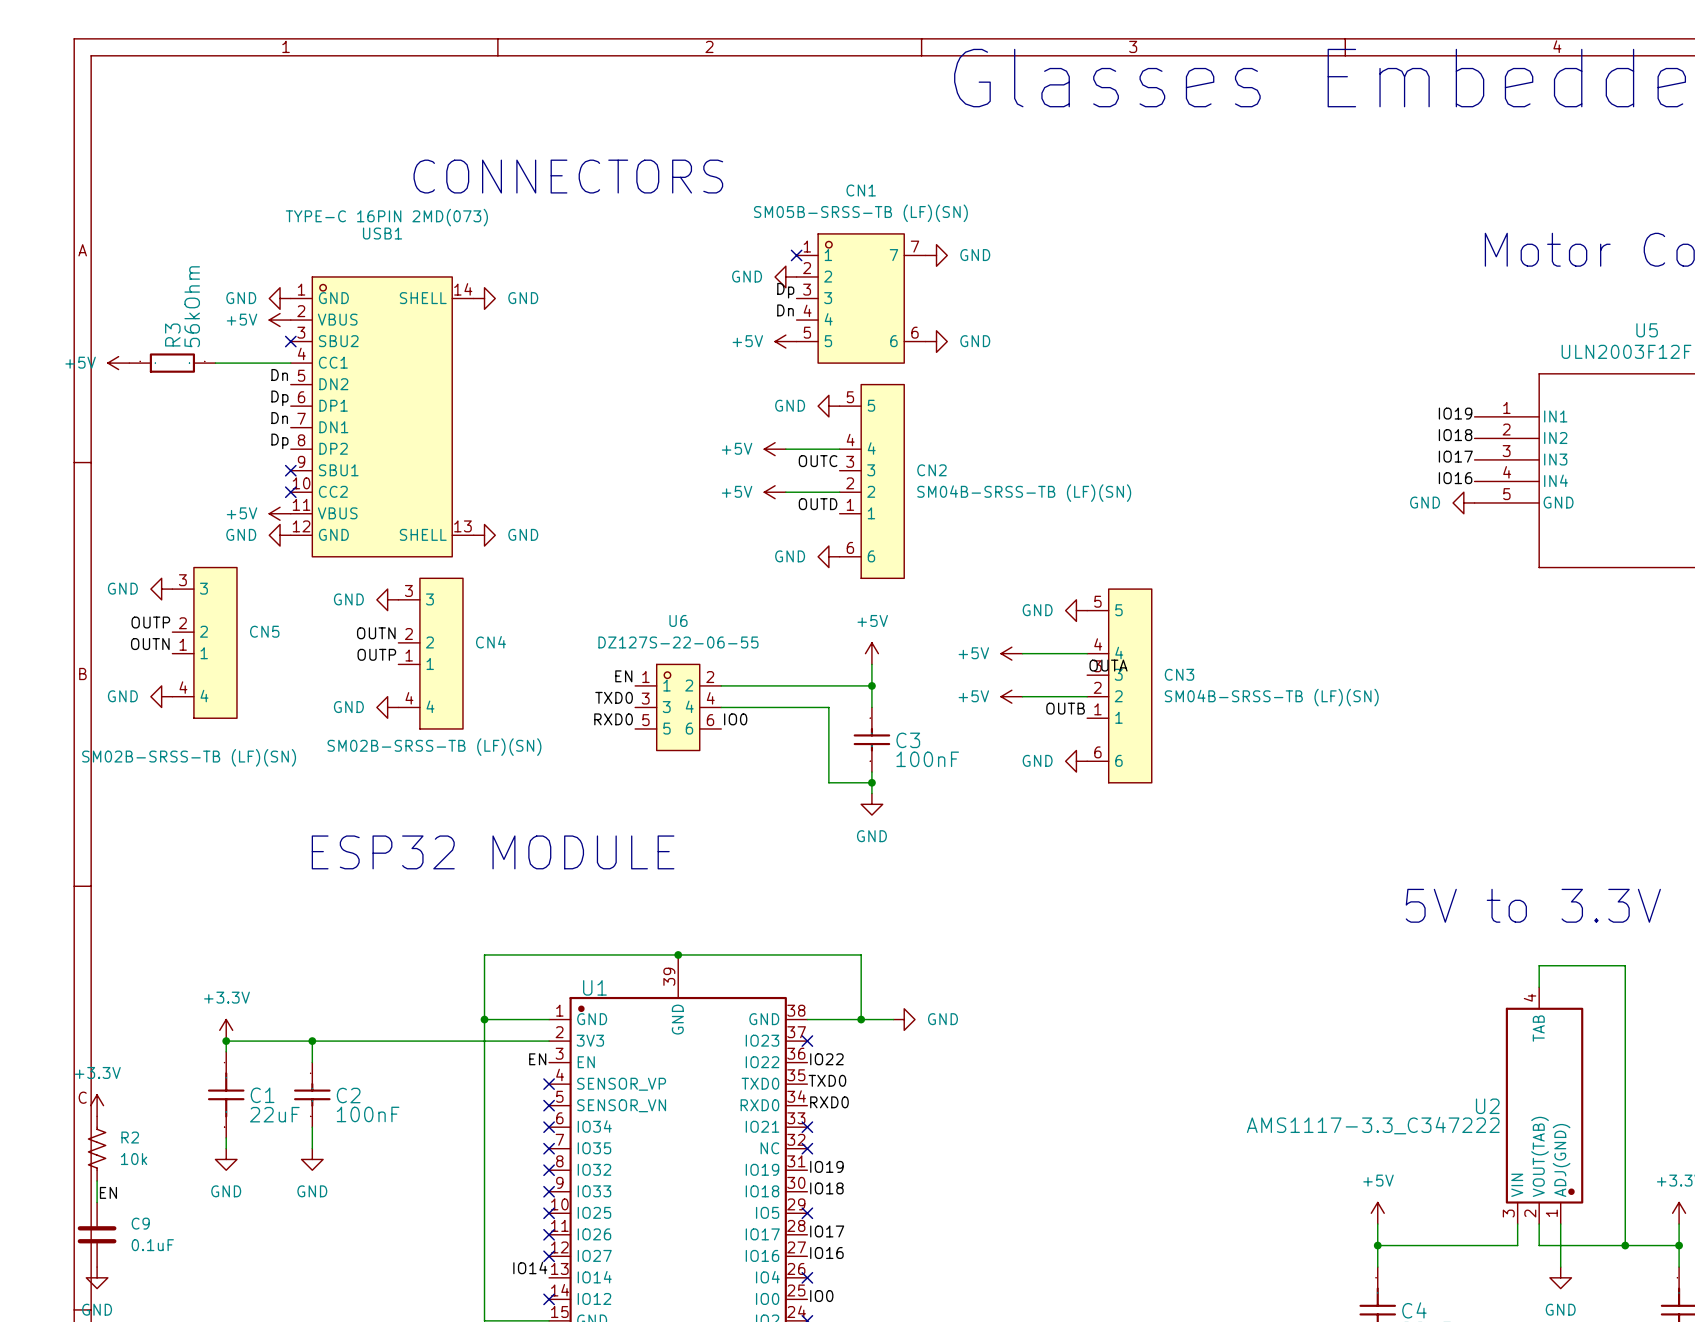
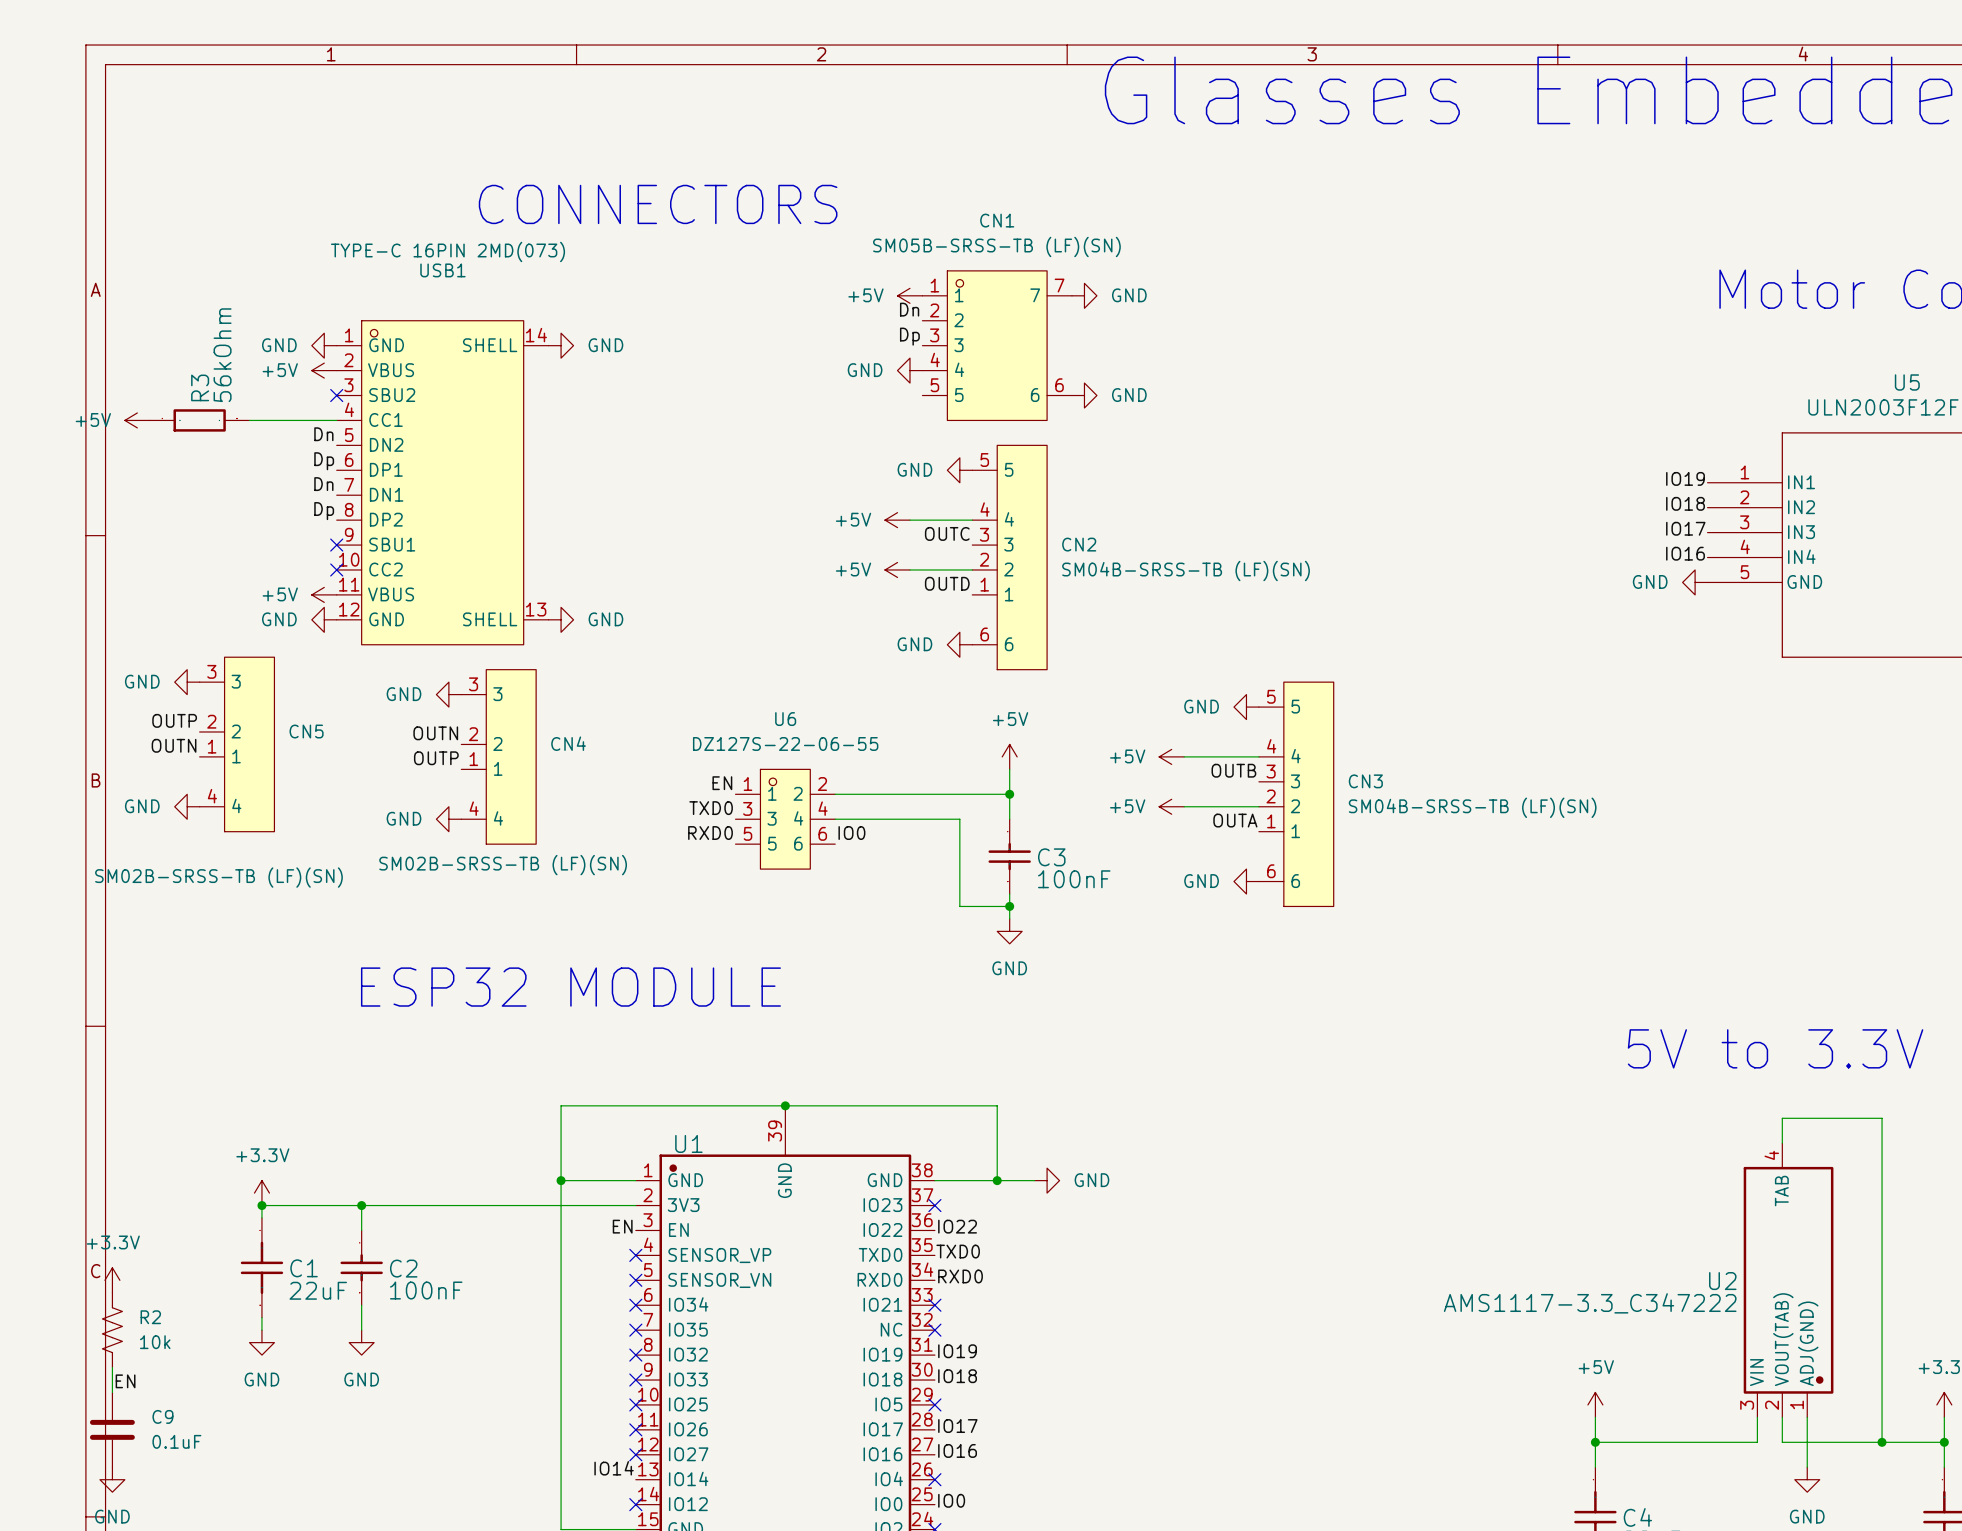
no-connect mark: (796, 255) -> none
power symbol position: GND (785, 276) -> GND (909, 370)
label position: Dn (785, 310) -> Dn (909, 309)
power symbol position: +5V (785, 341) -> +5V (909, 295)
label: OUTA (1108, 665) -> OUTB (1233, 770)
label: OUTB (1065, 708) -> OUTA (1235, 820)

